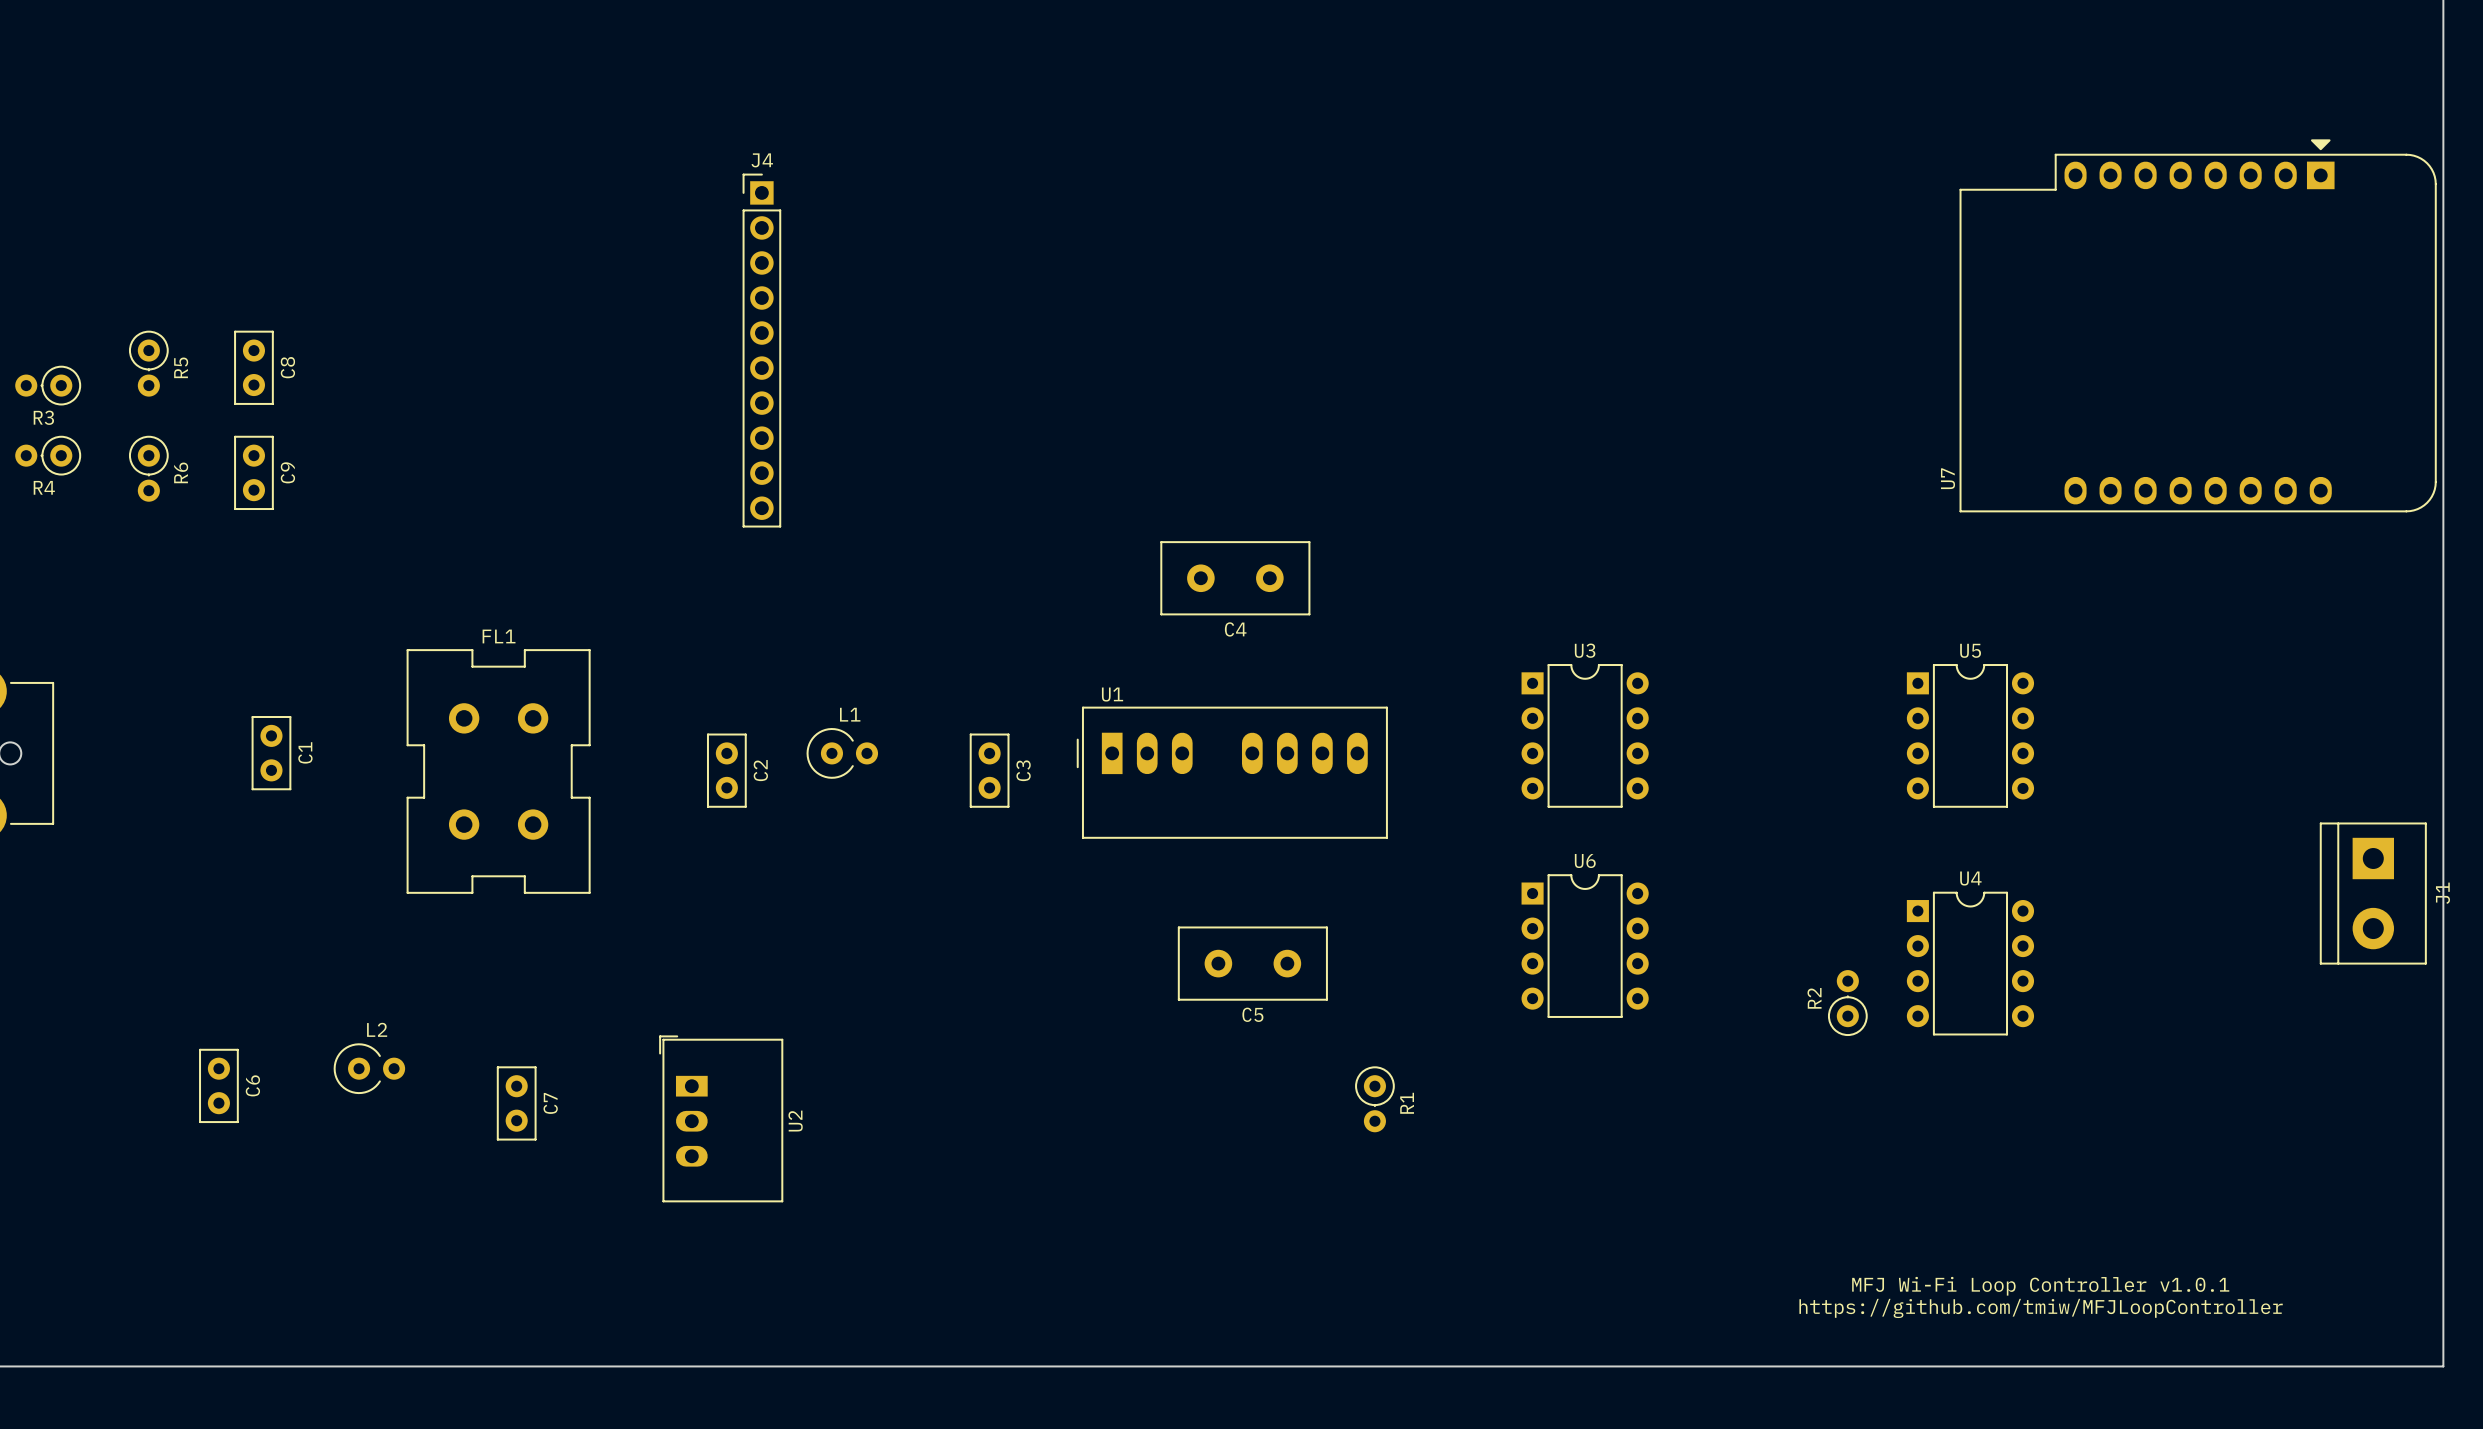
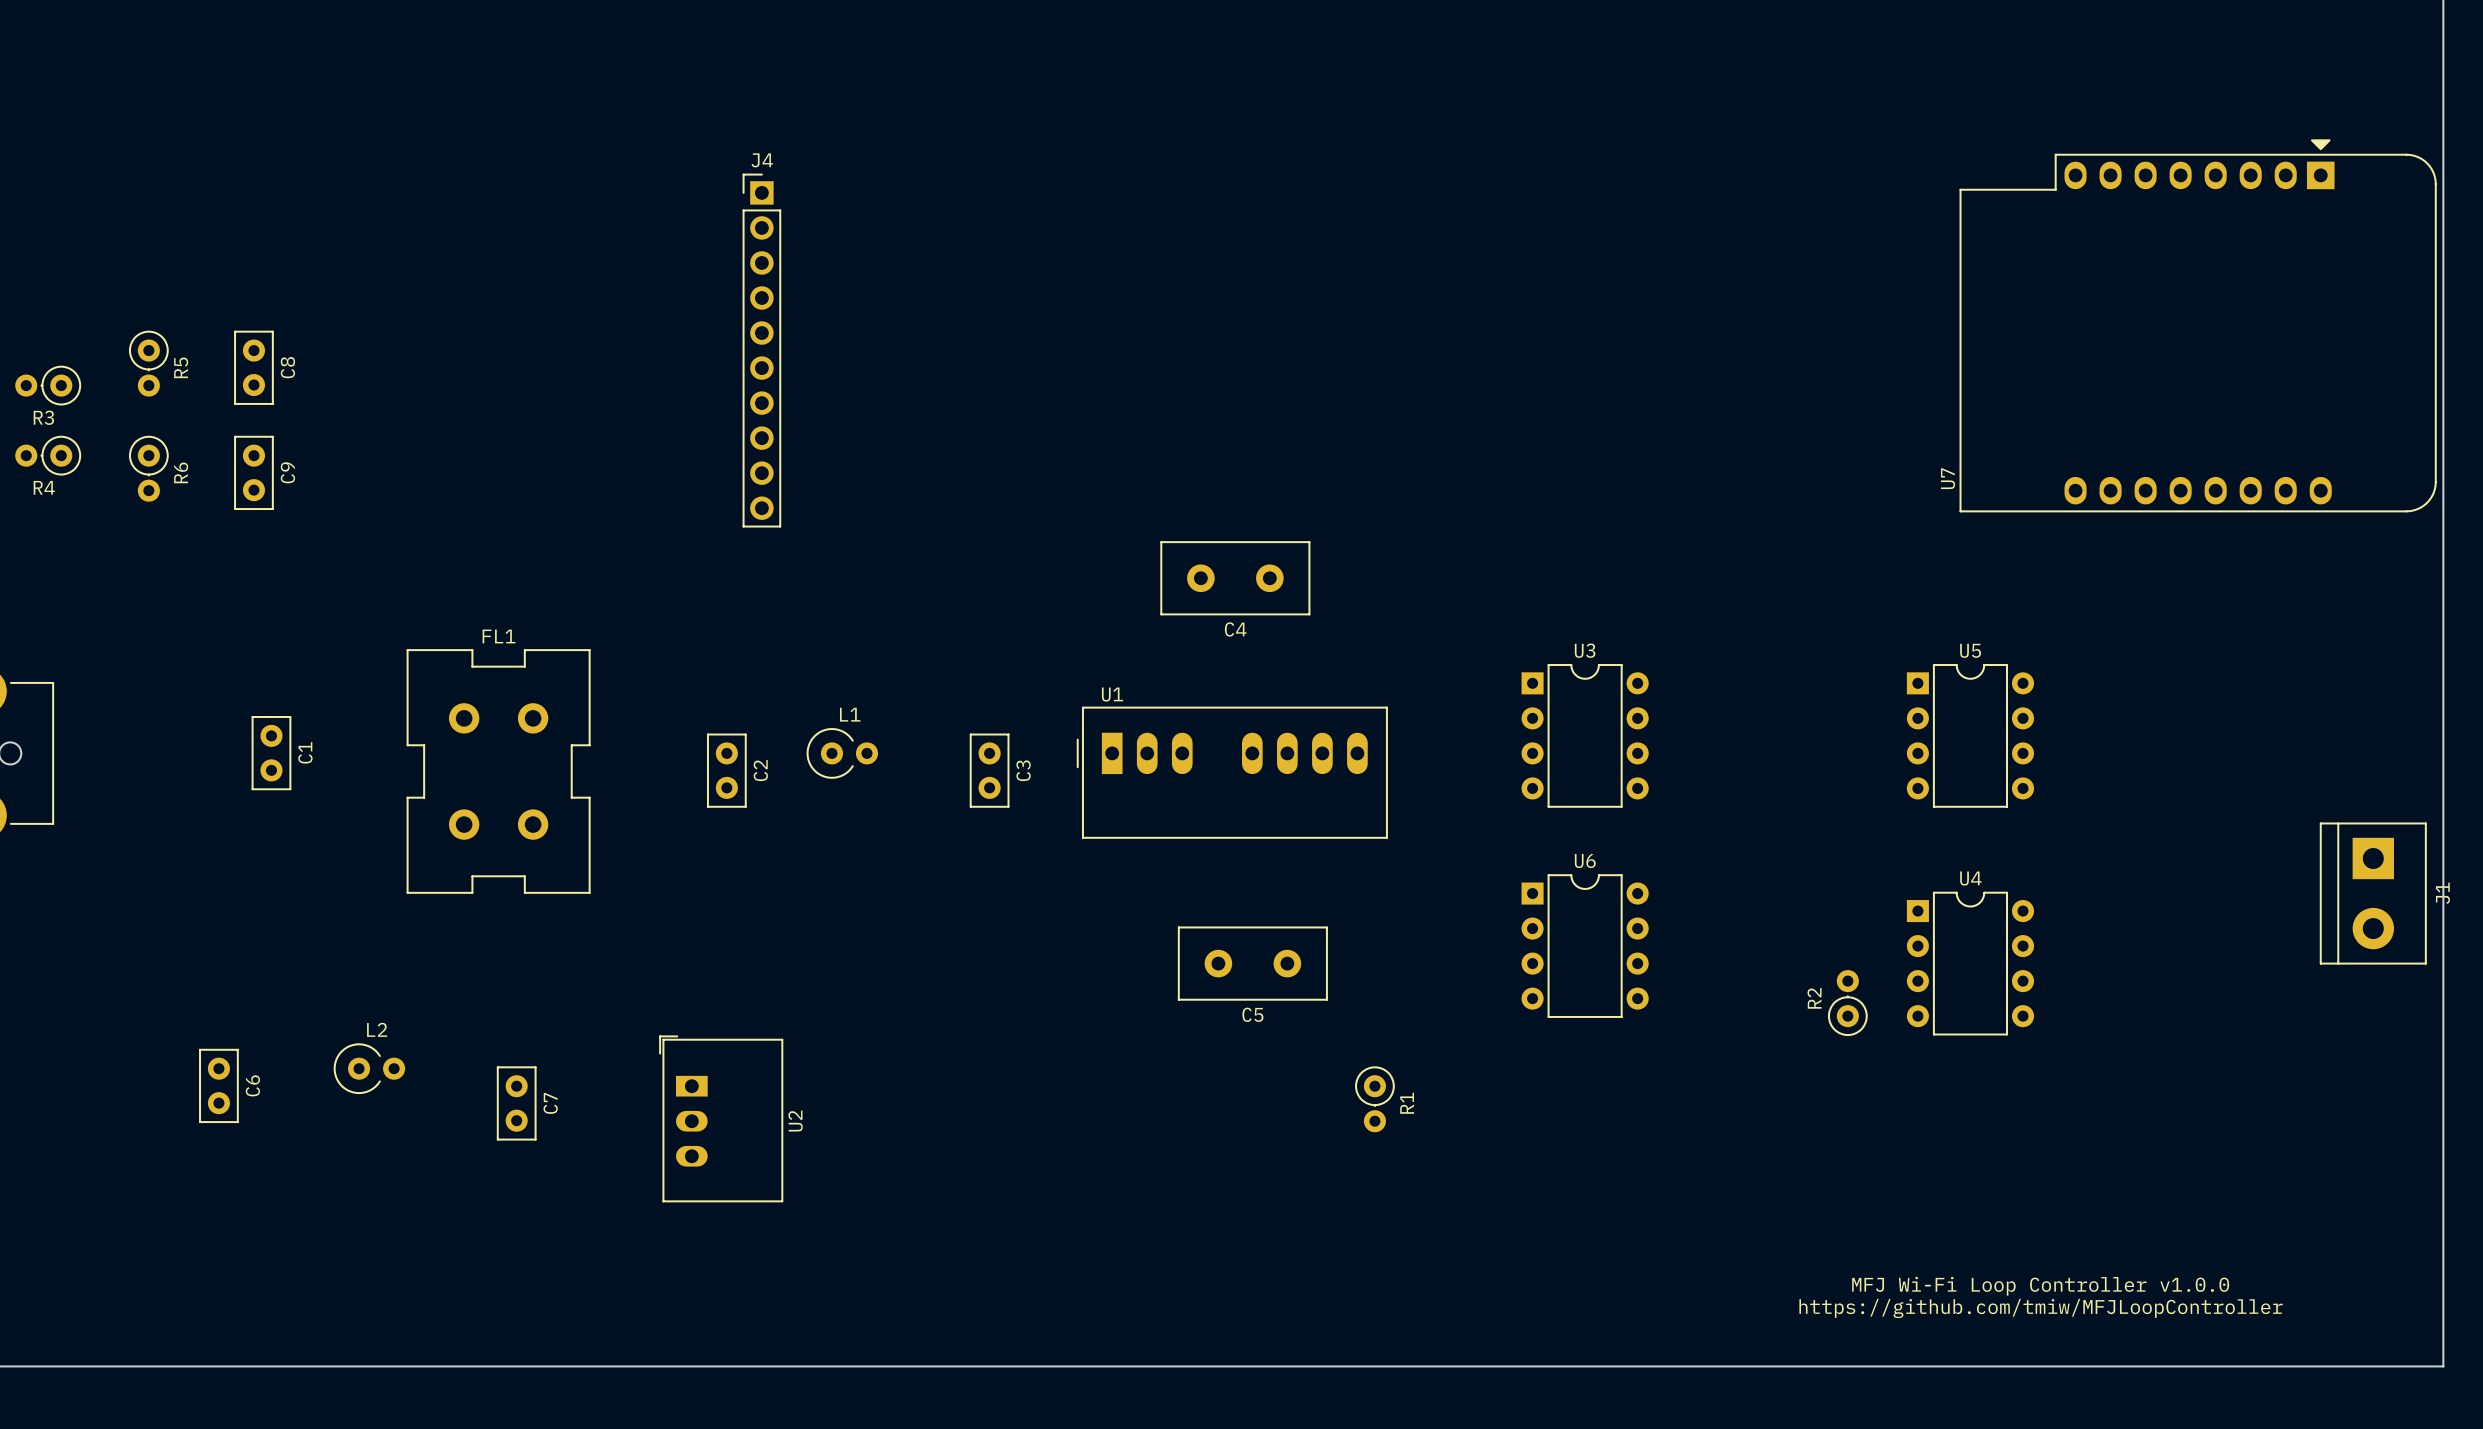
text: MFJ Wi-Fi Loop Controller v1.0.1 (2040, 1286) -> MFJ Wi-Fi Loop Controller v1.0.0 (2040, 1286)

